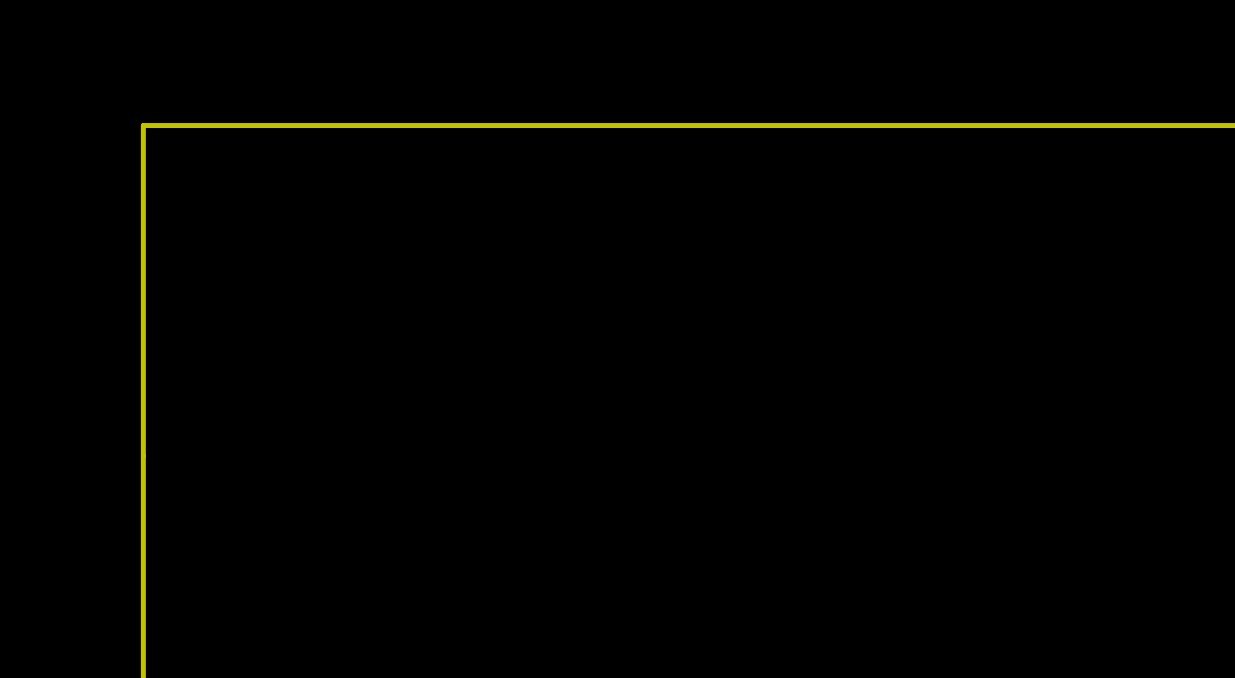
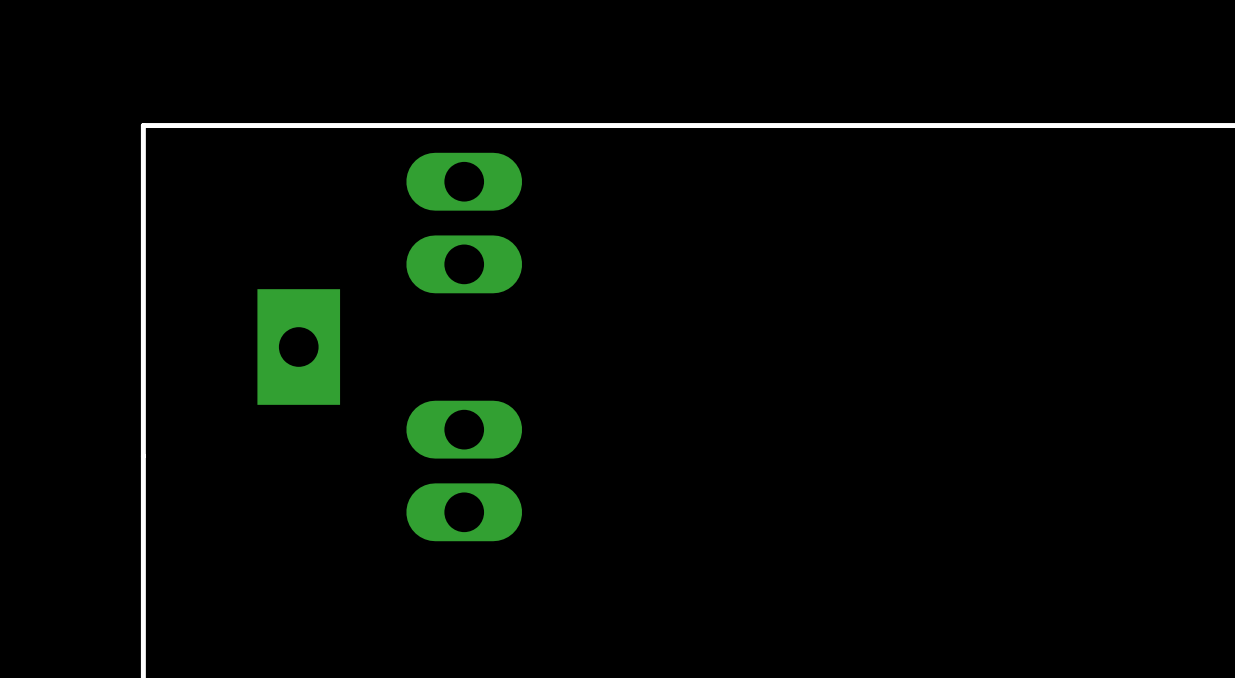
part: none -> (389, 347)

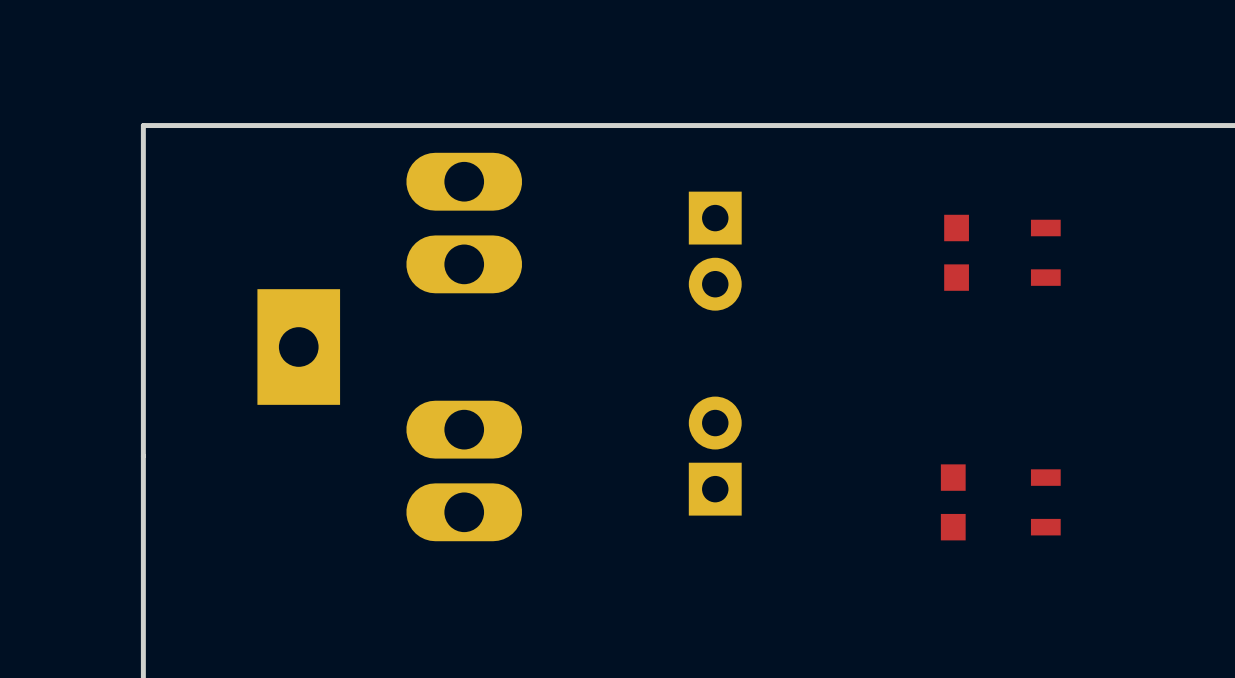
part: none -> (715, 251)
part: none -> (956, 252)
part: none -> (1045, 252)
part: none -> (715, 456)
part: none -> (953, 502)
part: none -> (1045, 502)

